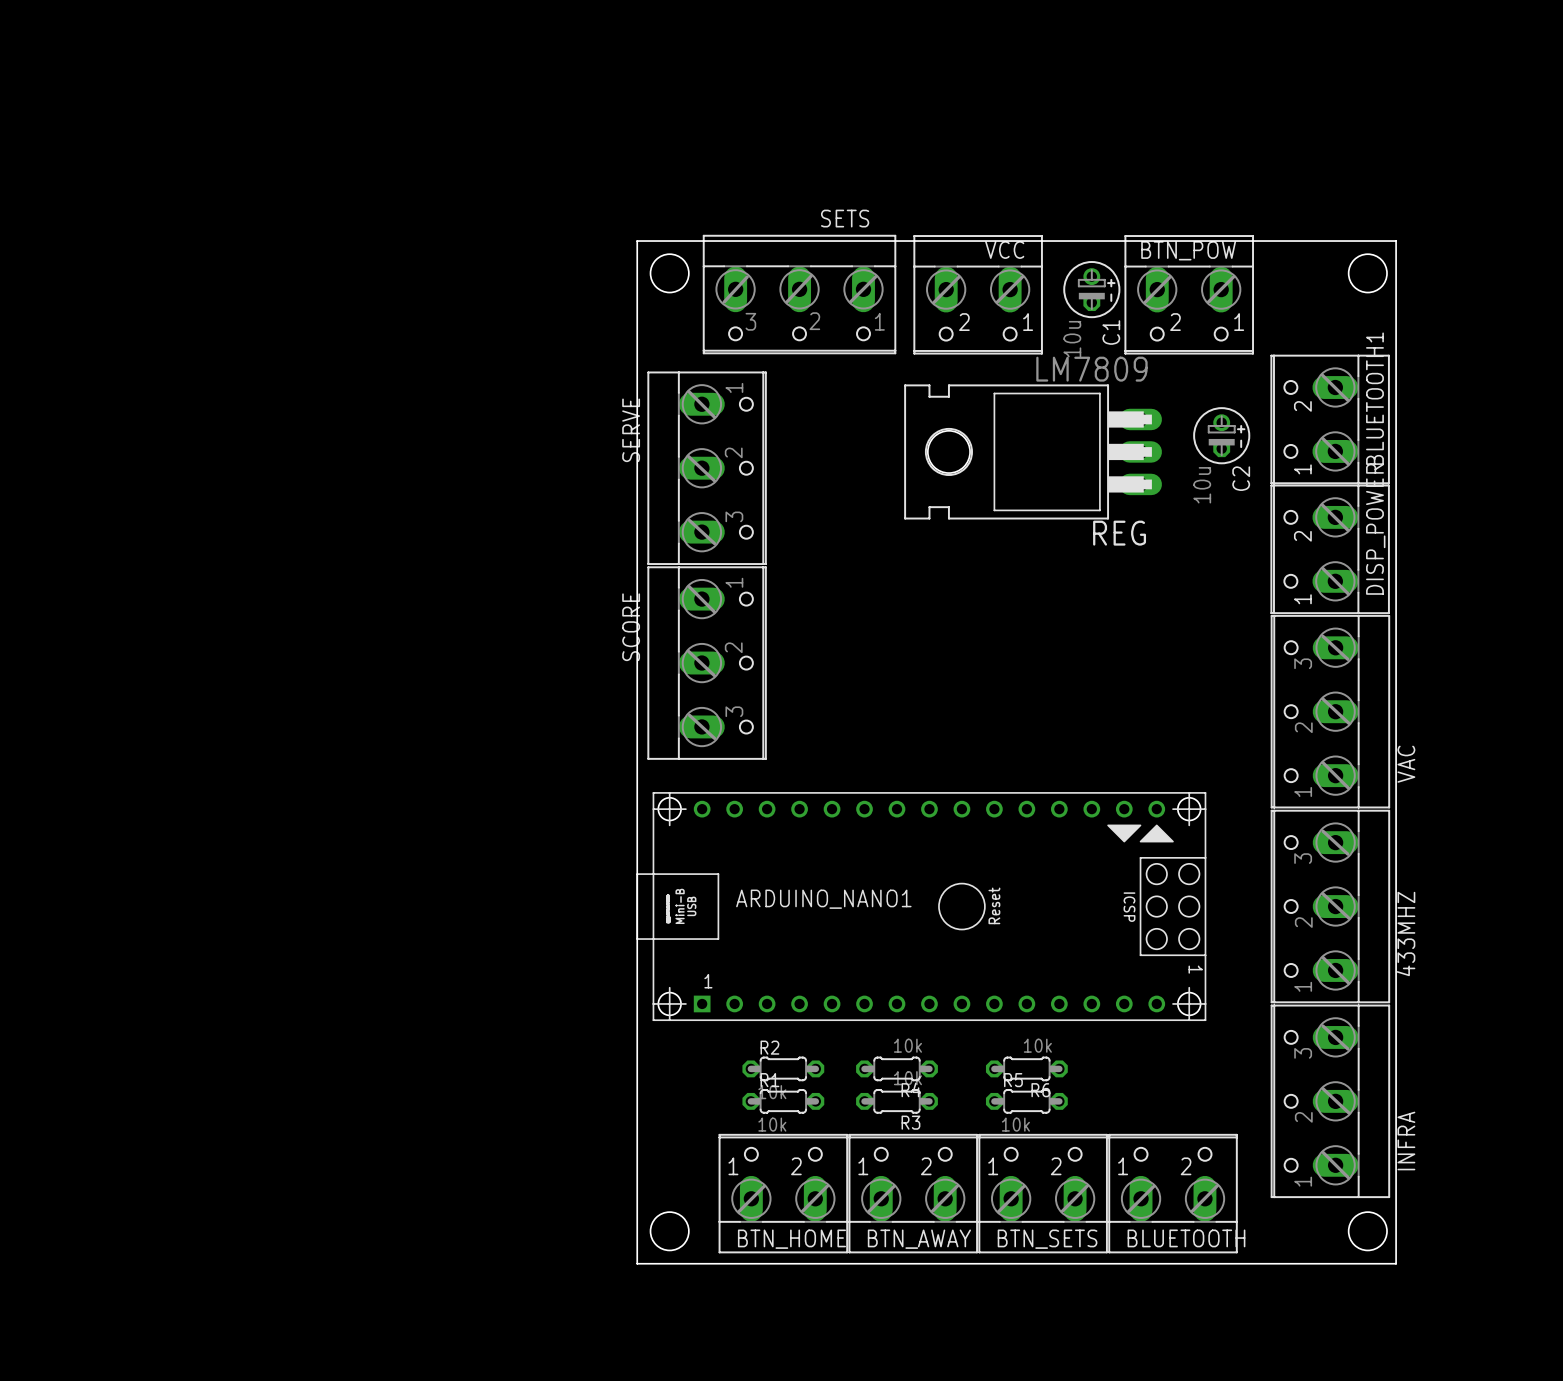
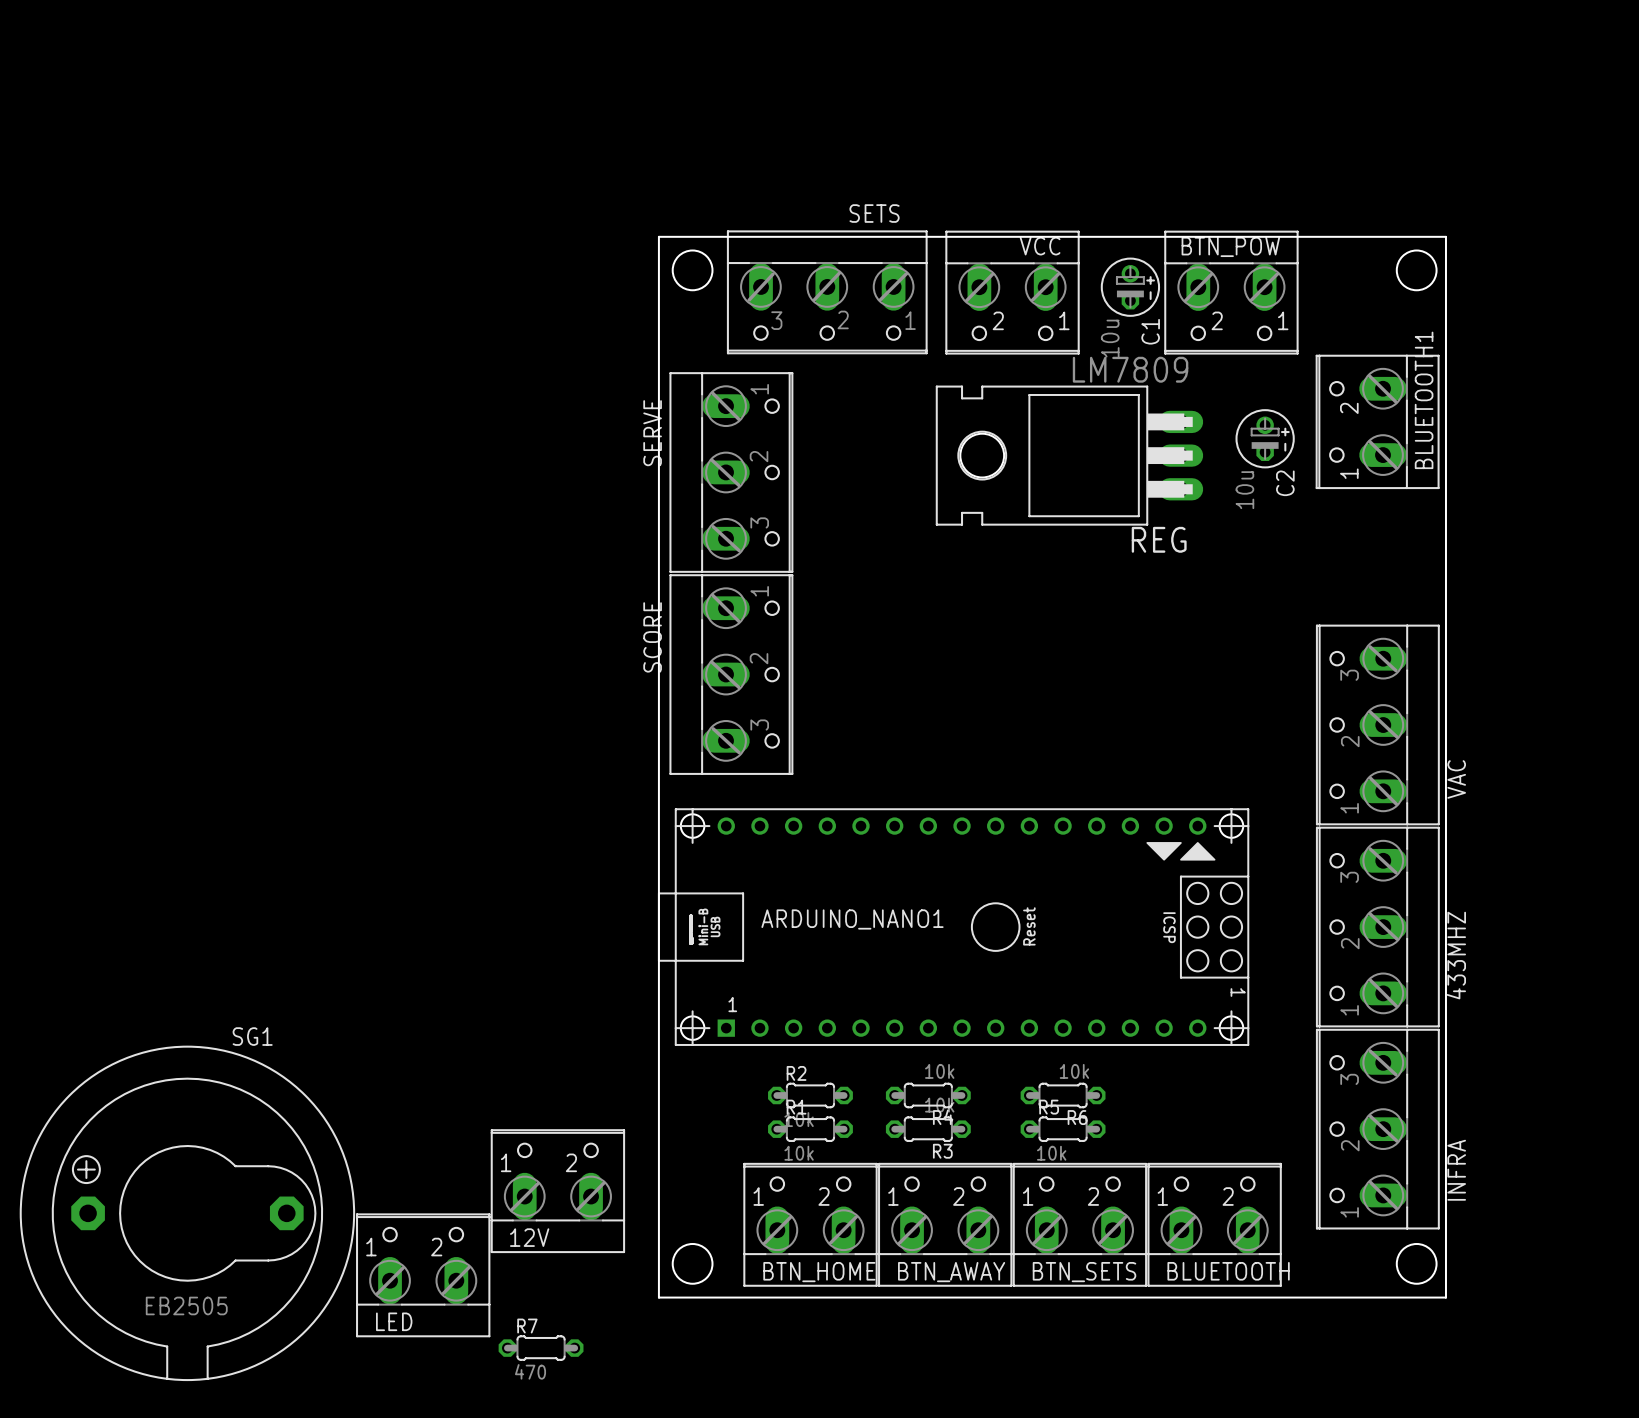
DISP_POWER: (1330, 549) -> none
12V: none -> (557, 1191)
SG1: none -> EB2505 (187, 1213)
LED: none -> (423, 1275)
R7: none -> 470 (541, 1348)

